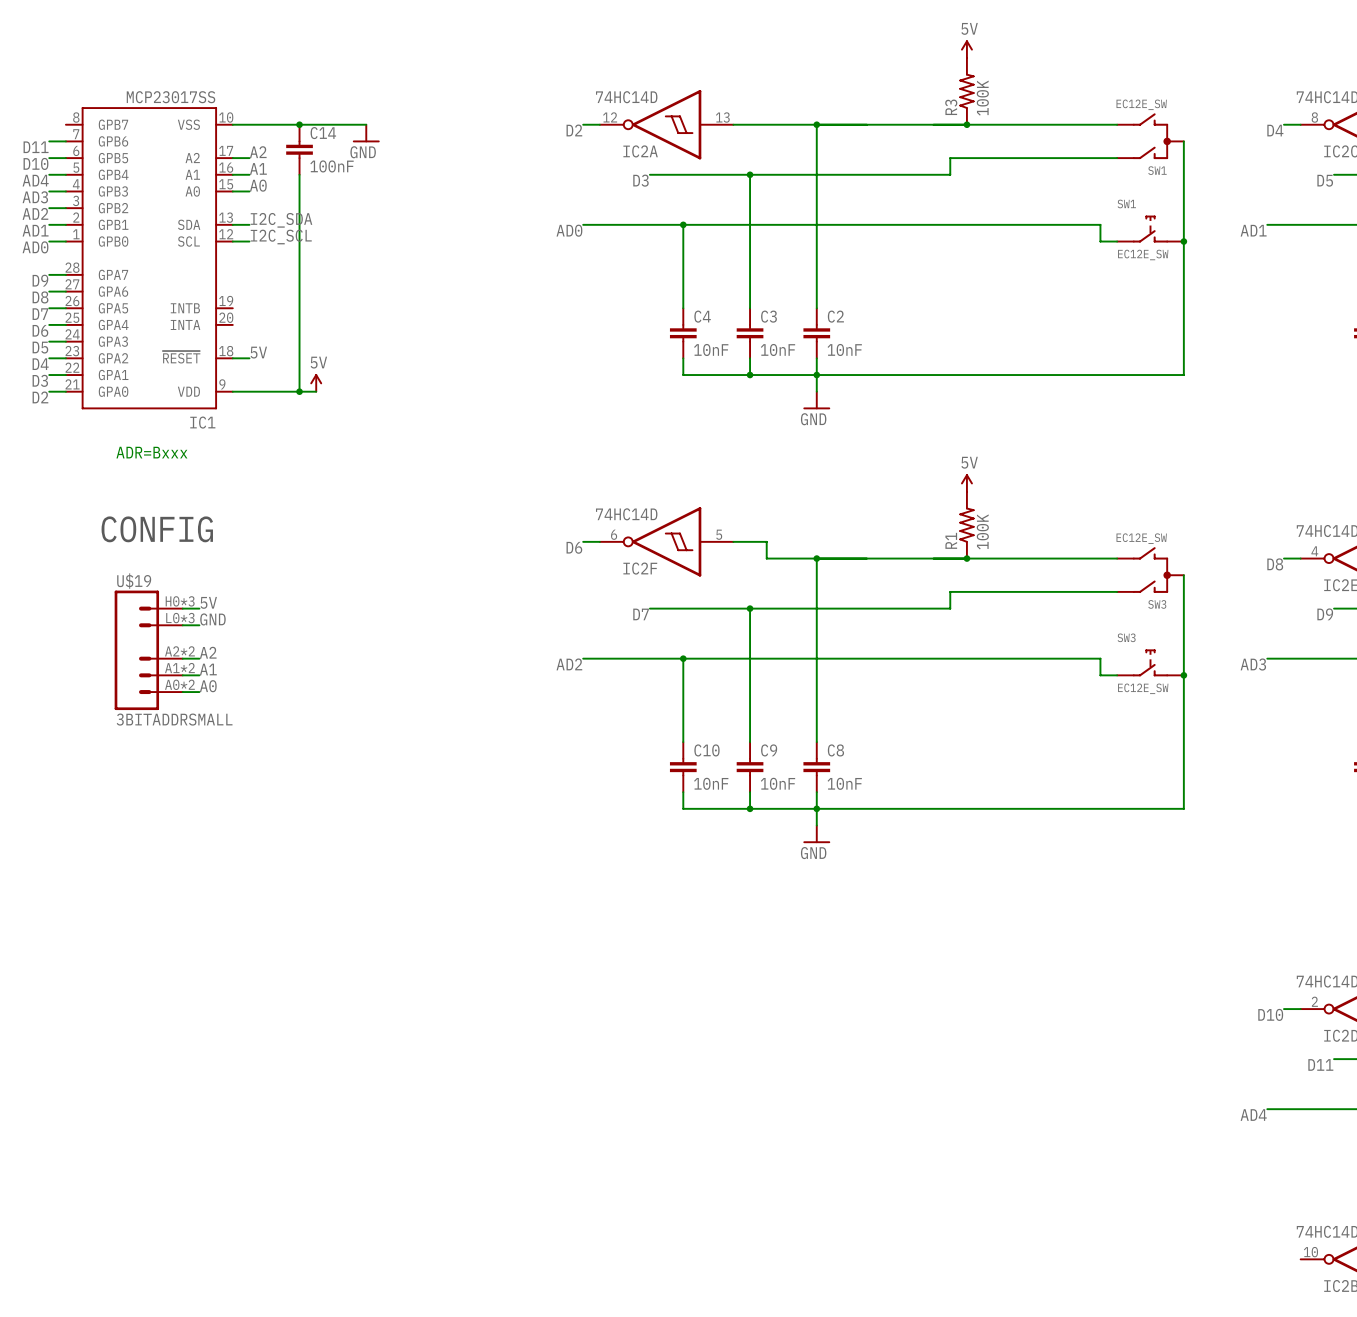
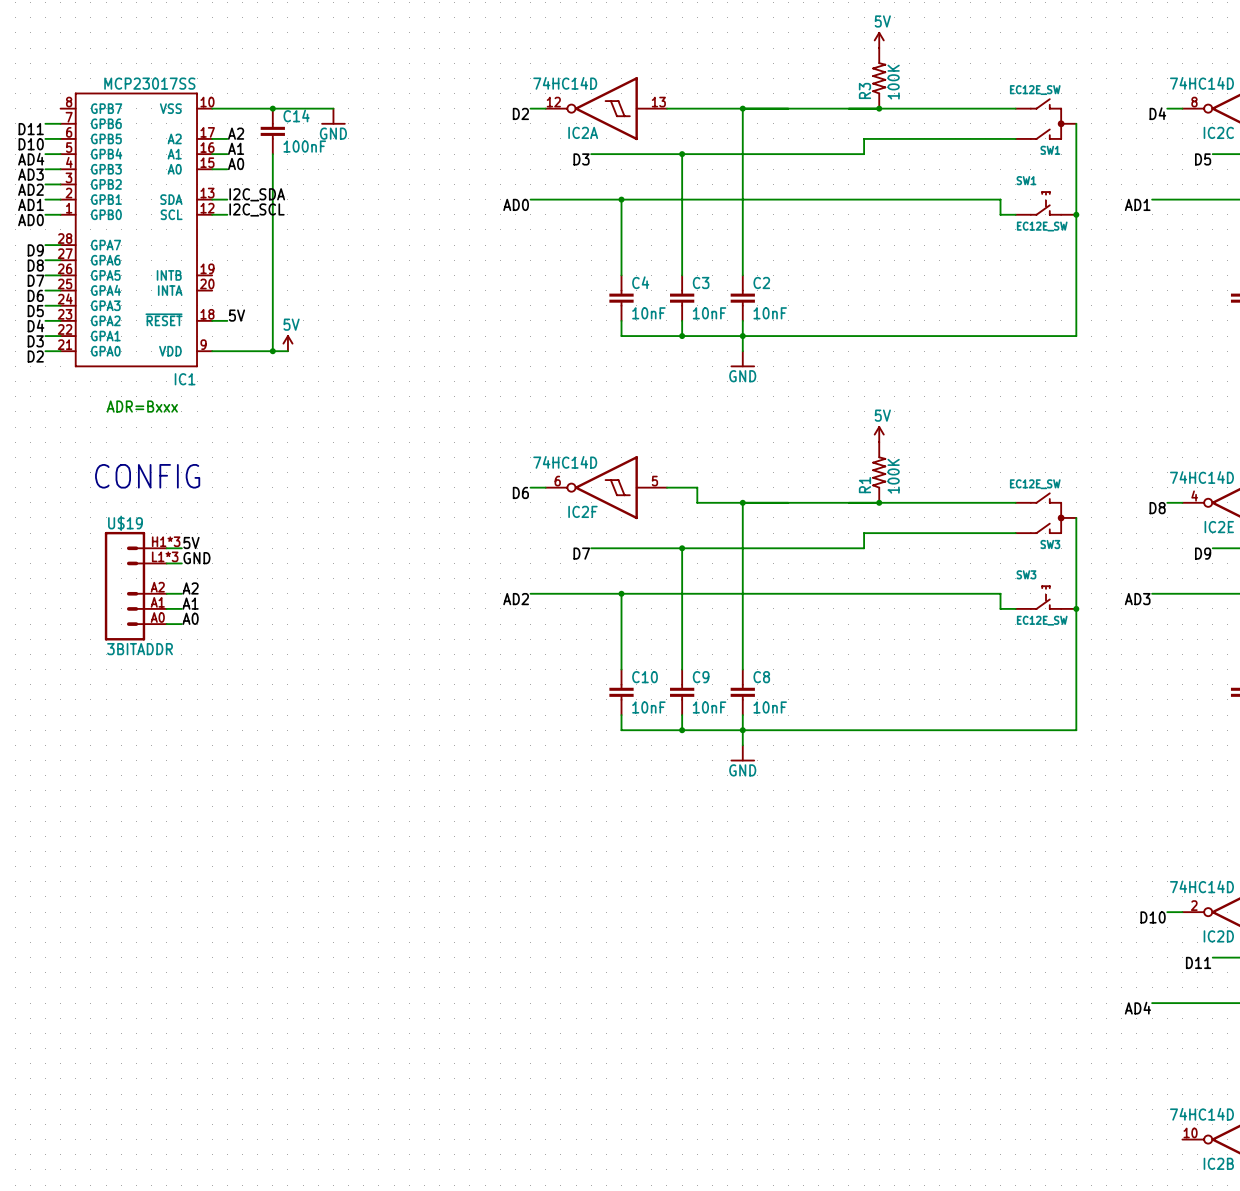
U$19 pin number: H0*3 (180, 601) -> H1*3 (166, 541)
U$19 pin number: L0*3 (180, 618) -> L1*3 (165, 556)
U$19 pin number: A2*2 (179, 651) -> A2 (157, 587)
U$19 pin number: A1*2 (179, 668) -> A1 (157, 602)
U$19 pin number: A0*2 (179, 684) -> A0 (157, 617)
U$19 value: 3BITADDRSMALL (174, 719) -> 3BITADDR (140, 649)

